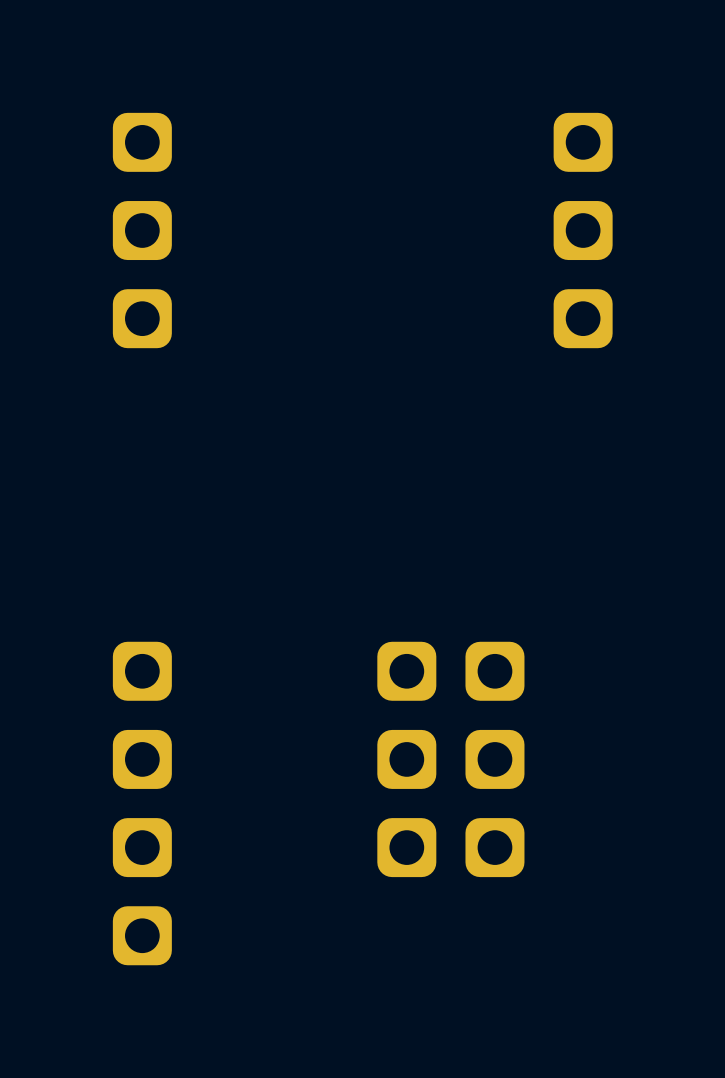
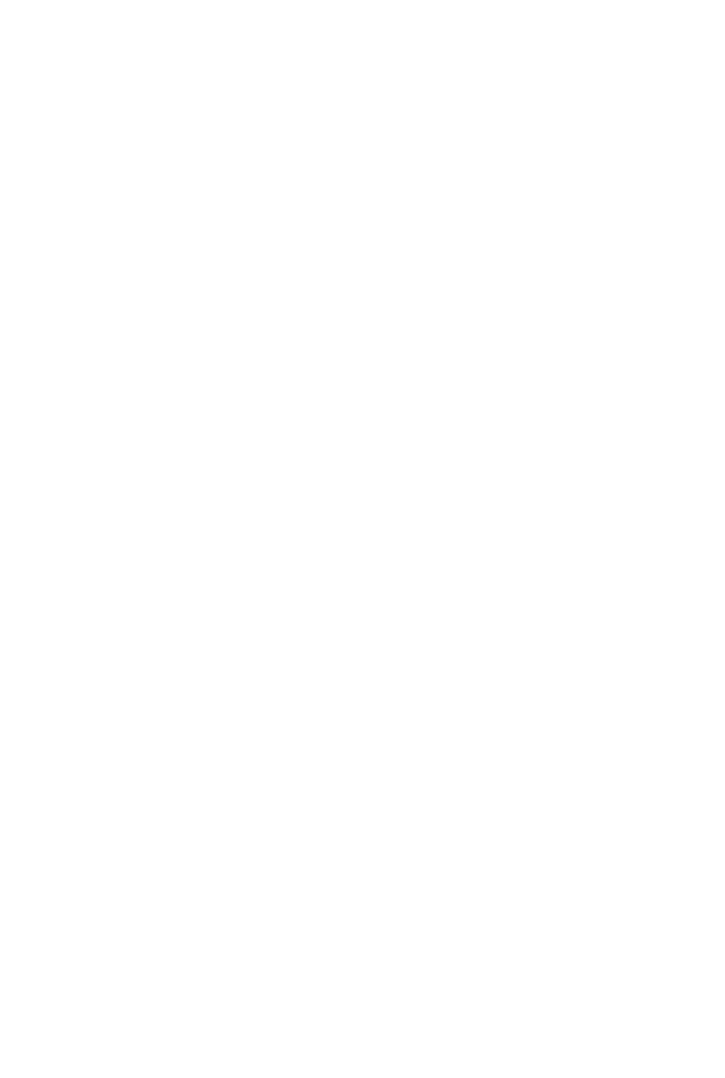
part: (142, 230) -> none
part: (583, 230) -> none
part: (406, 759) -> none
part: (494, 759) -> none
part: (142, 803) -> none

